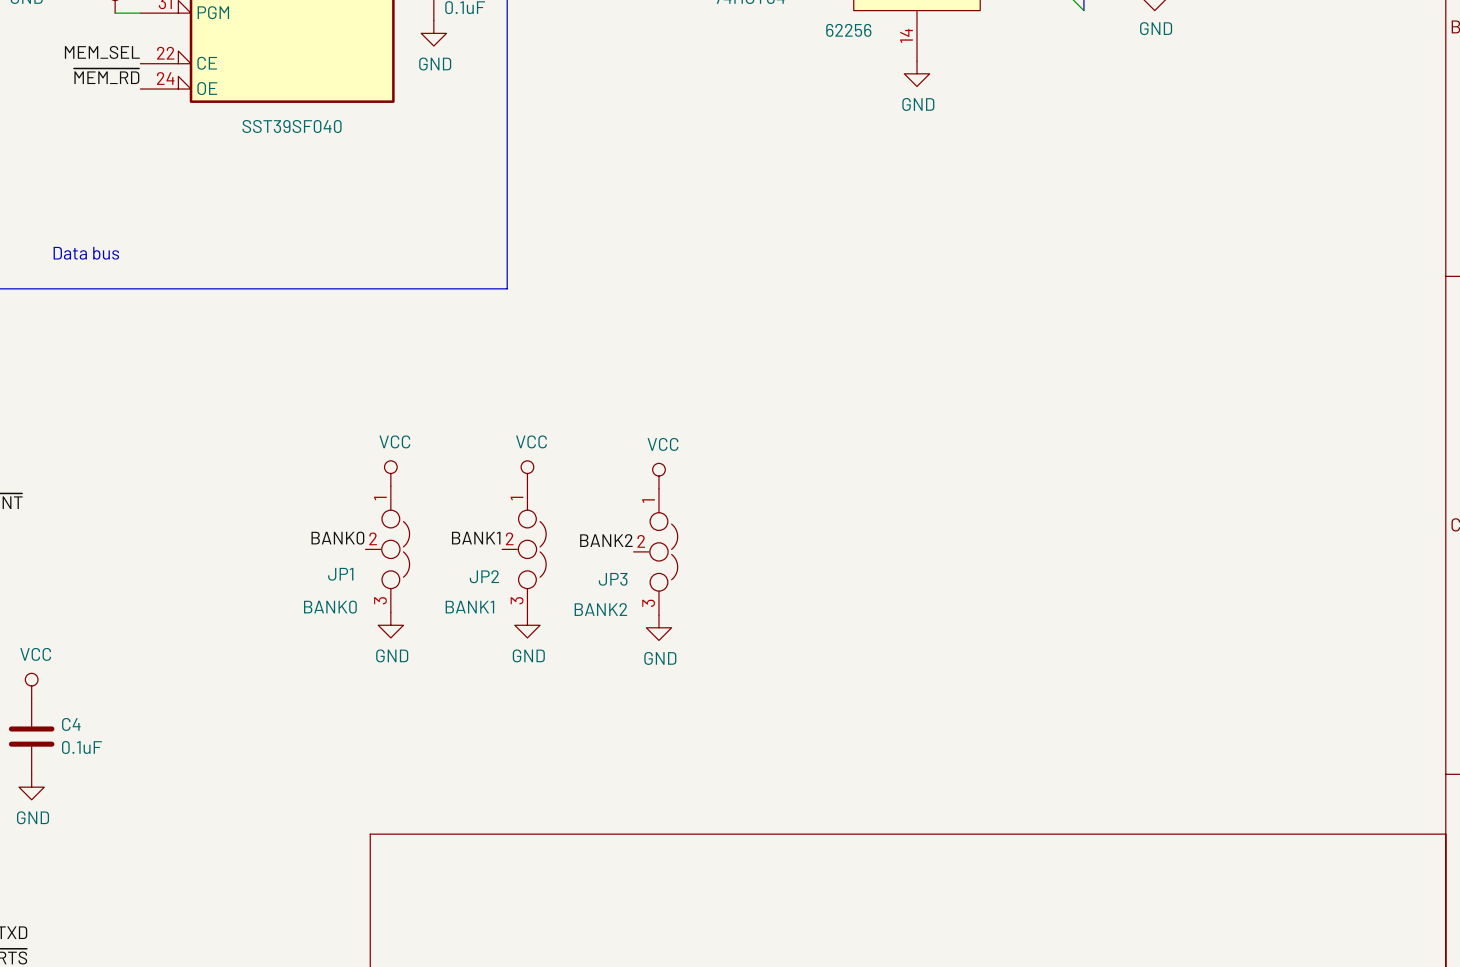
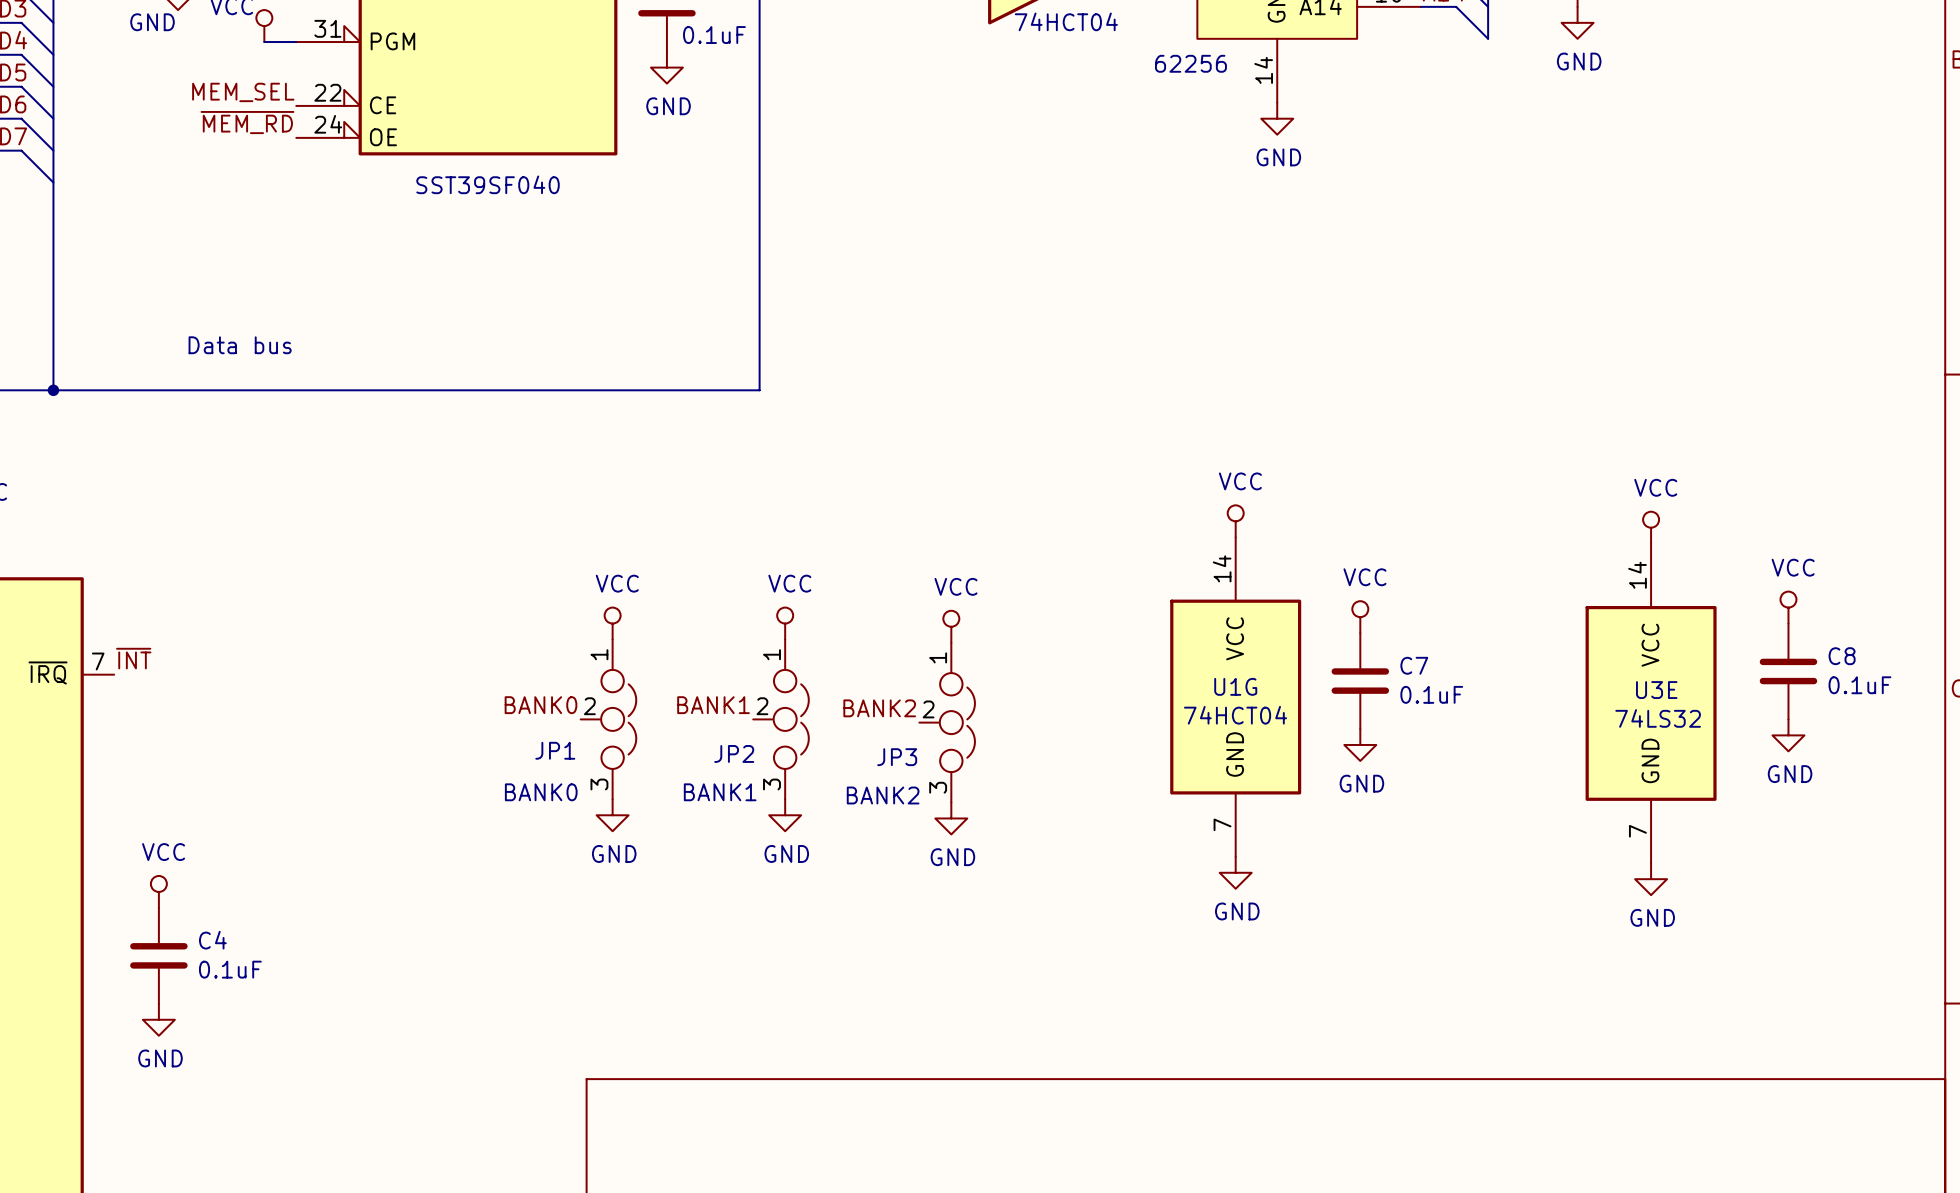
power symbol: none -> VCC (1235, 521)
power symbol: none -> VCC (1651, 527)
power symbol: none -> VCC (1788, 607)
power symbol: none -> VCC (1360, 617)
C8: none -> 0.1uF (1788, 671)
C7: none -> 0.1uF (1360, 681)
U1G: none -> 74HCT04 (1235, 697)
U3E: none -> 74LS32 (1651, 703)
power symbol: none -> GND (1788, 735)
power symbol: none -> GND (1360, 744)
power symbol: none -> GND (1235, 872)
power symbol: none -> GND (1651, 879)

